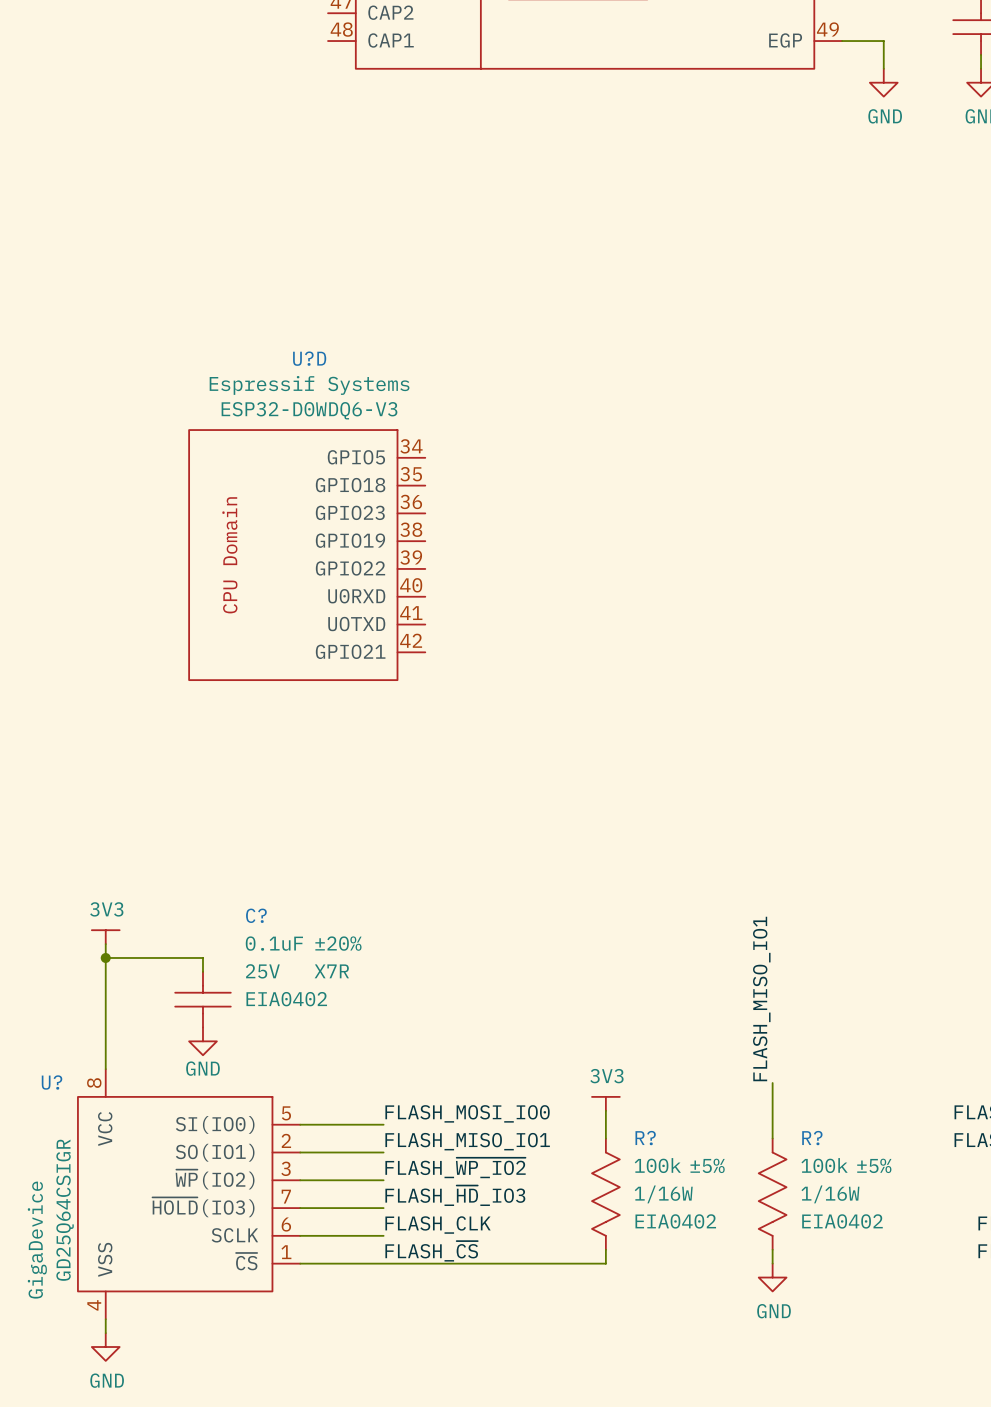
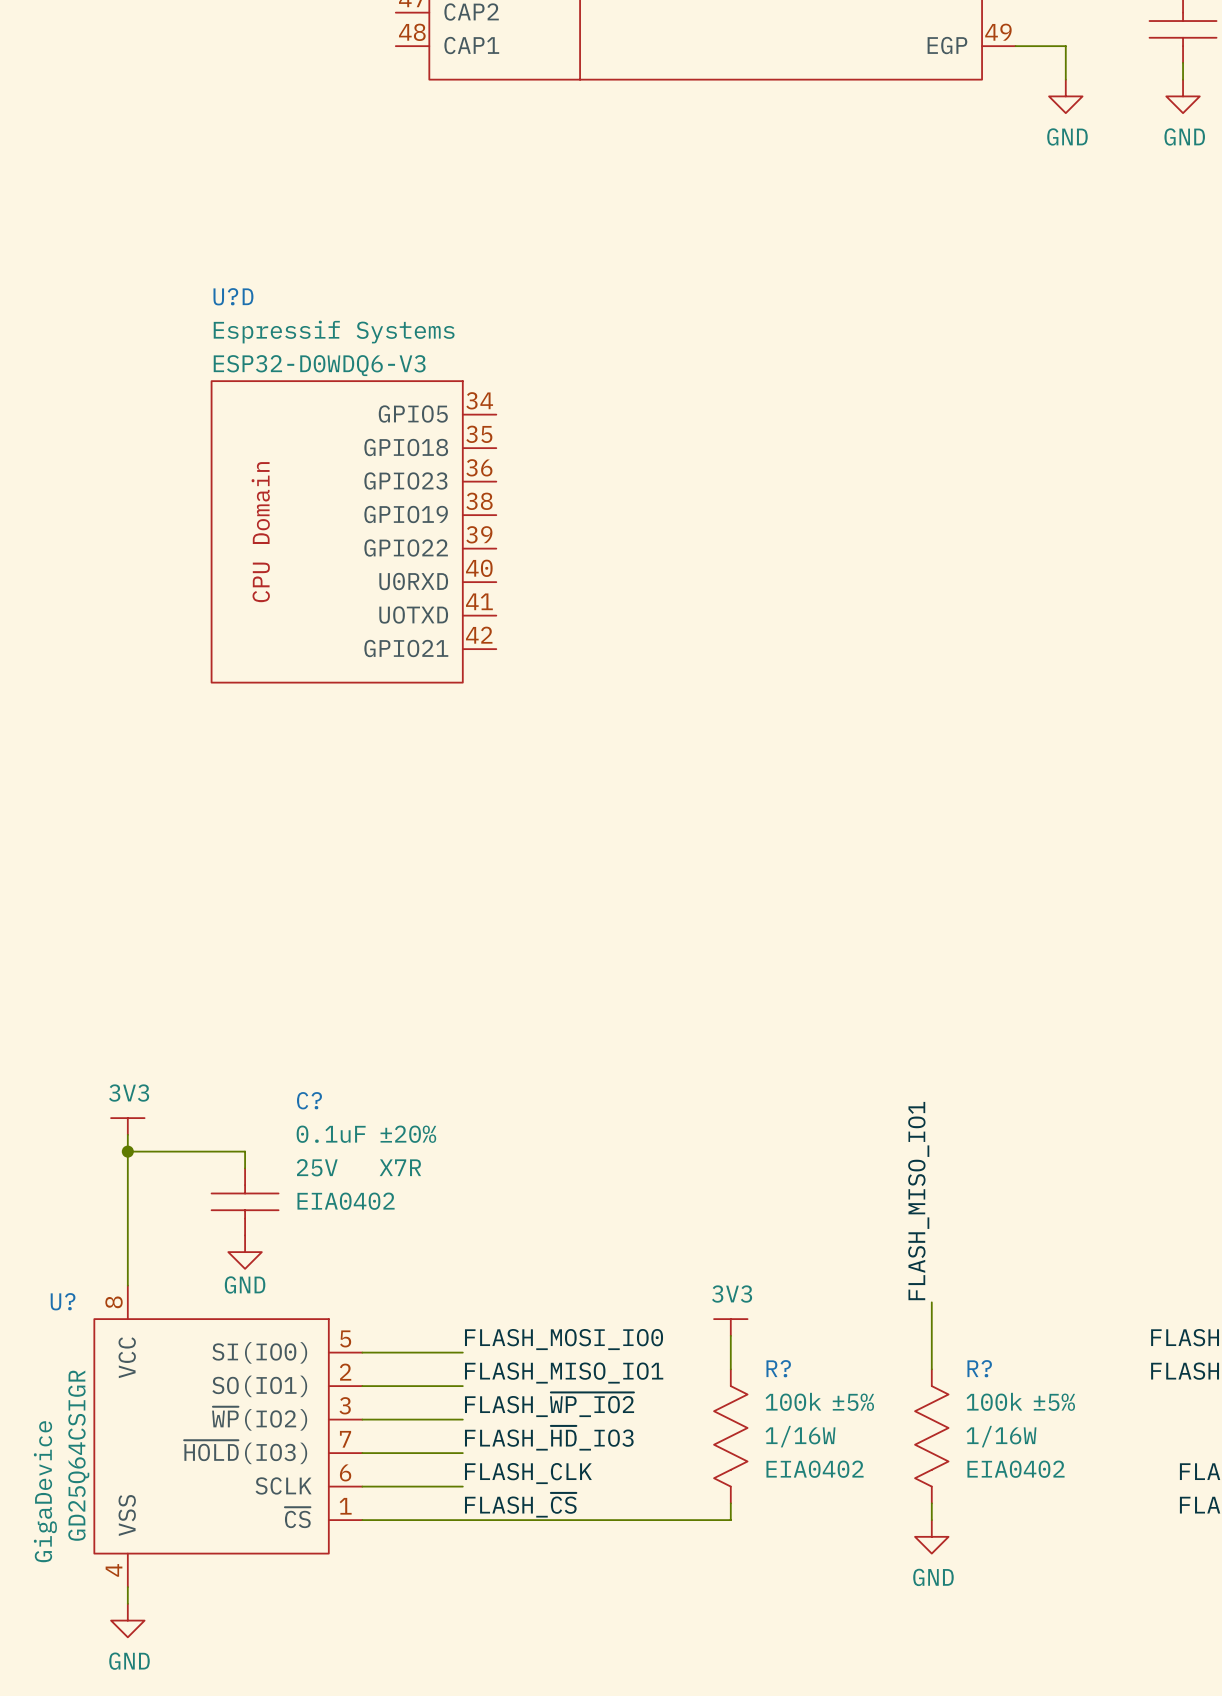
U?D name position: U?D (309, 358) -> U?D (233, 296)
U?D text position: Espressif Systems (309, 385) -> Espressif Systems (334, 332)
U?D text position: ESP32-D0WDQ6-V3 (309, 410) -> ESP32-D0WDQ6-V3 (319, 365)
U?D position: (307, 555) -> (353, 531)

